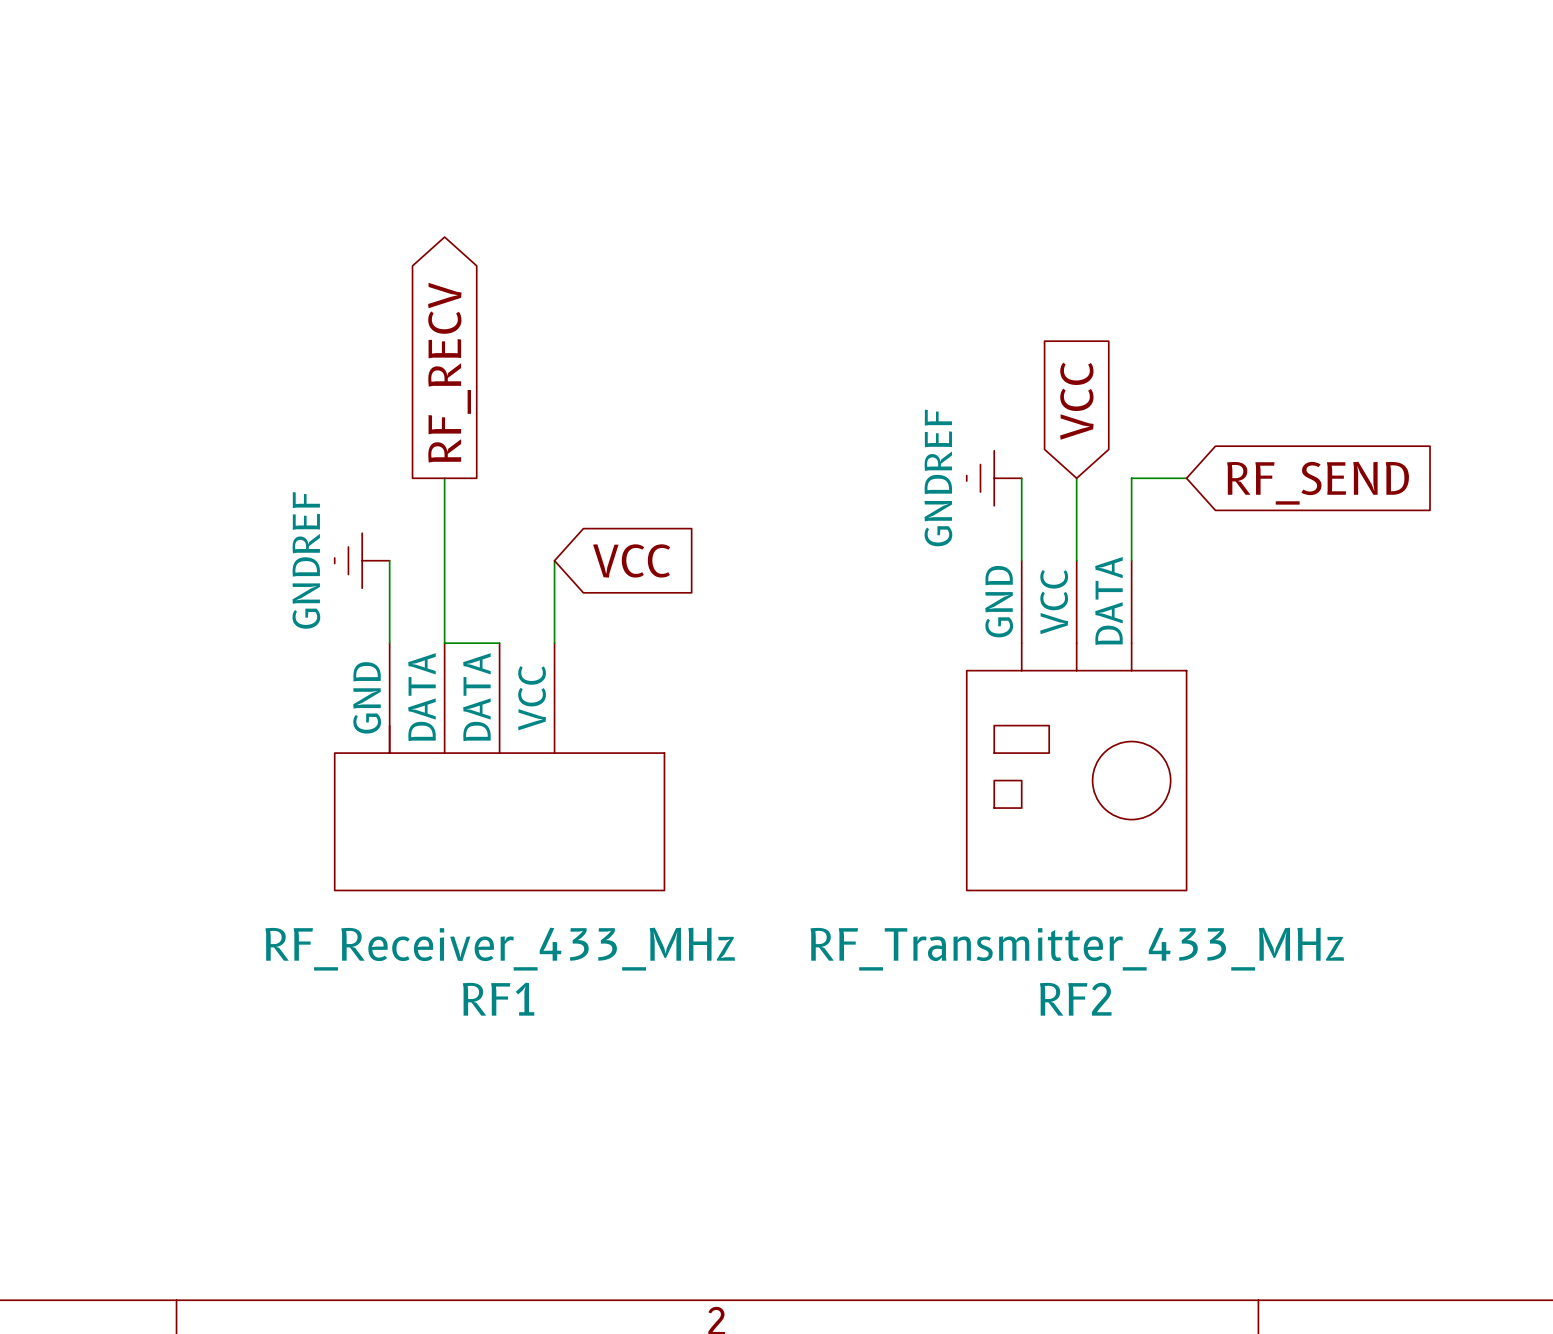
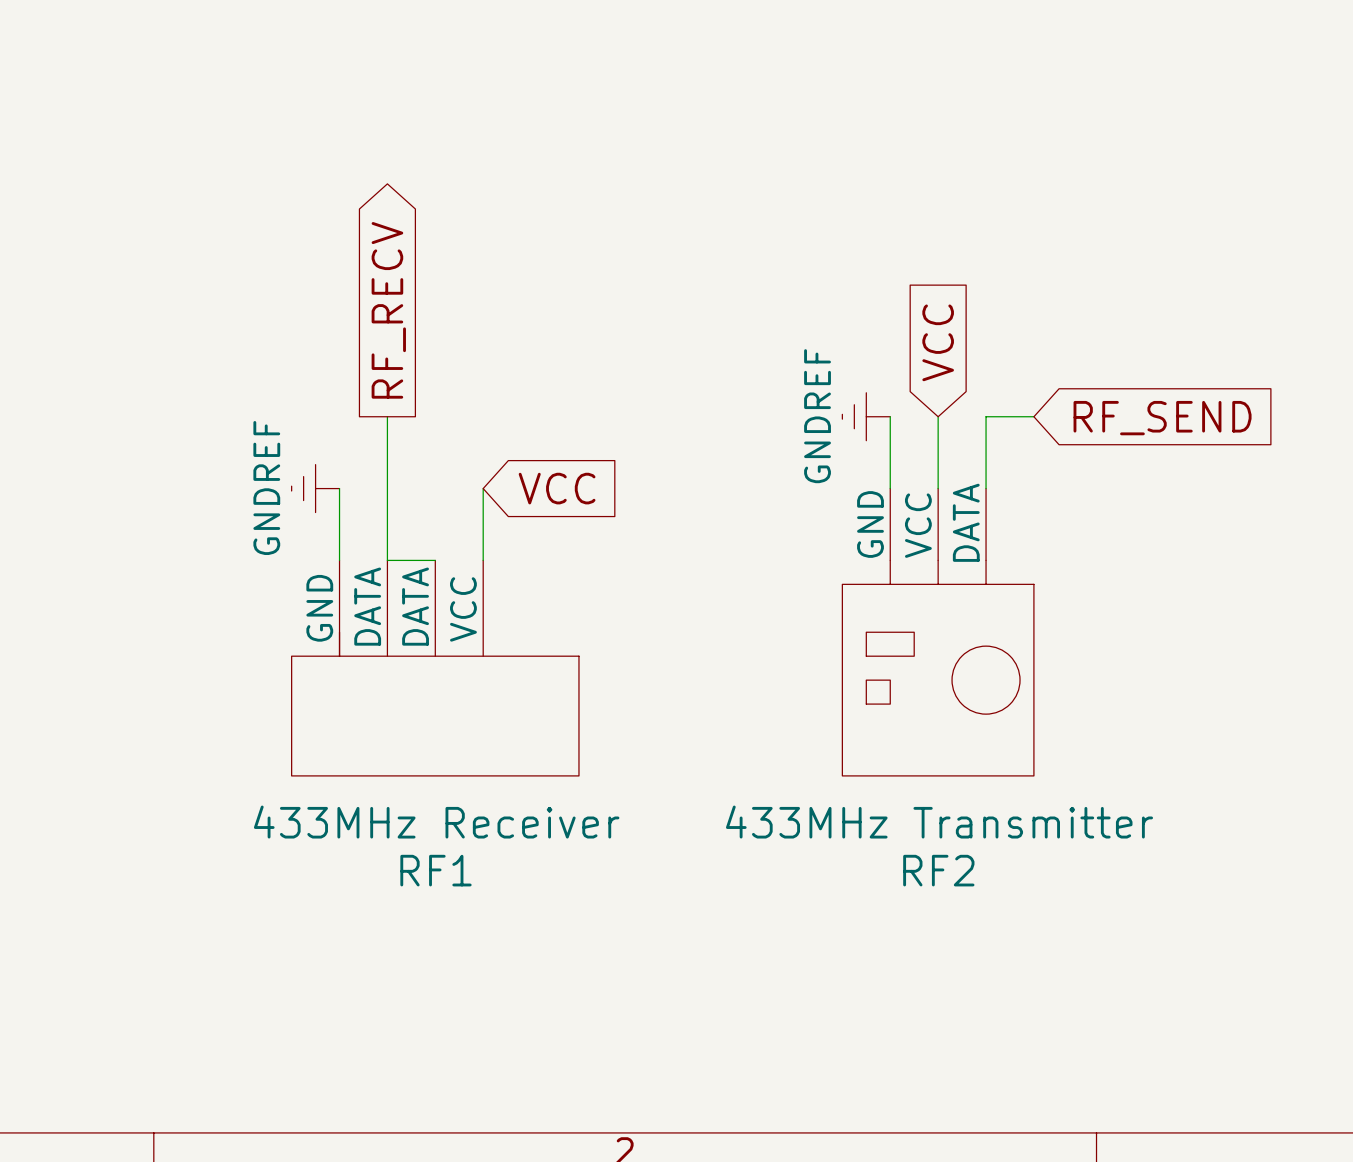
RF1 value: RF_Receiver_433_MHz (500, 949) -> 433MHz Receiver (436, 822)
RF2 value: RF_Transmitter_433_MHz (1077, 949) -> 433MHz Transmitter (939, 822)

